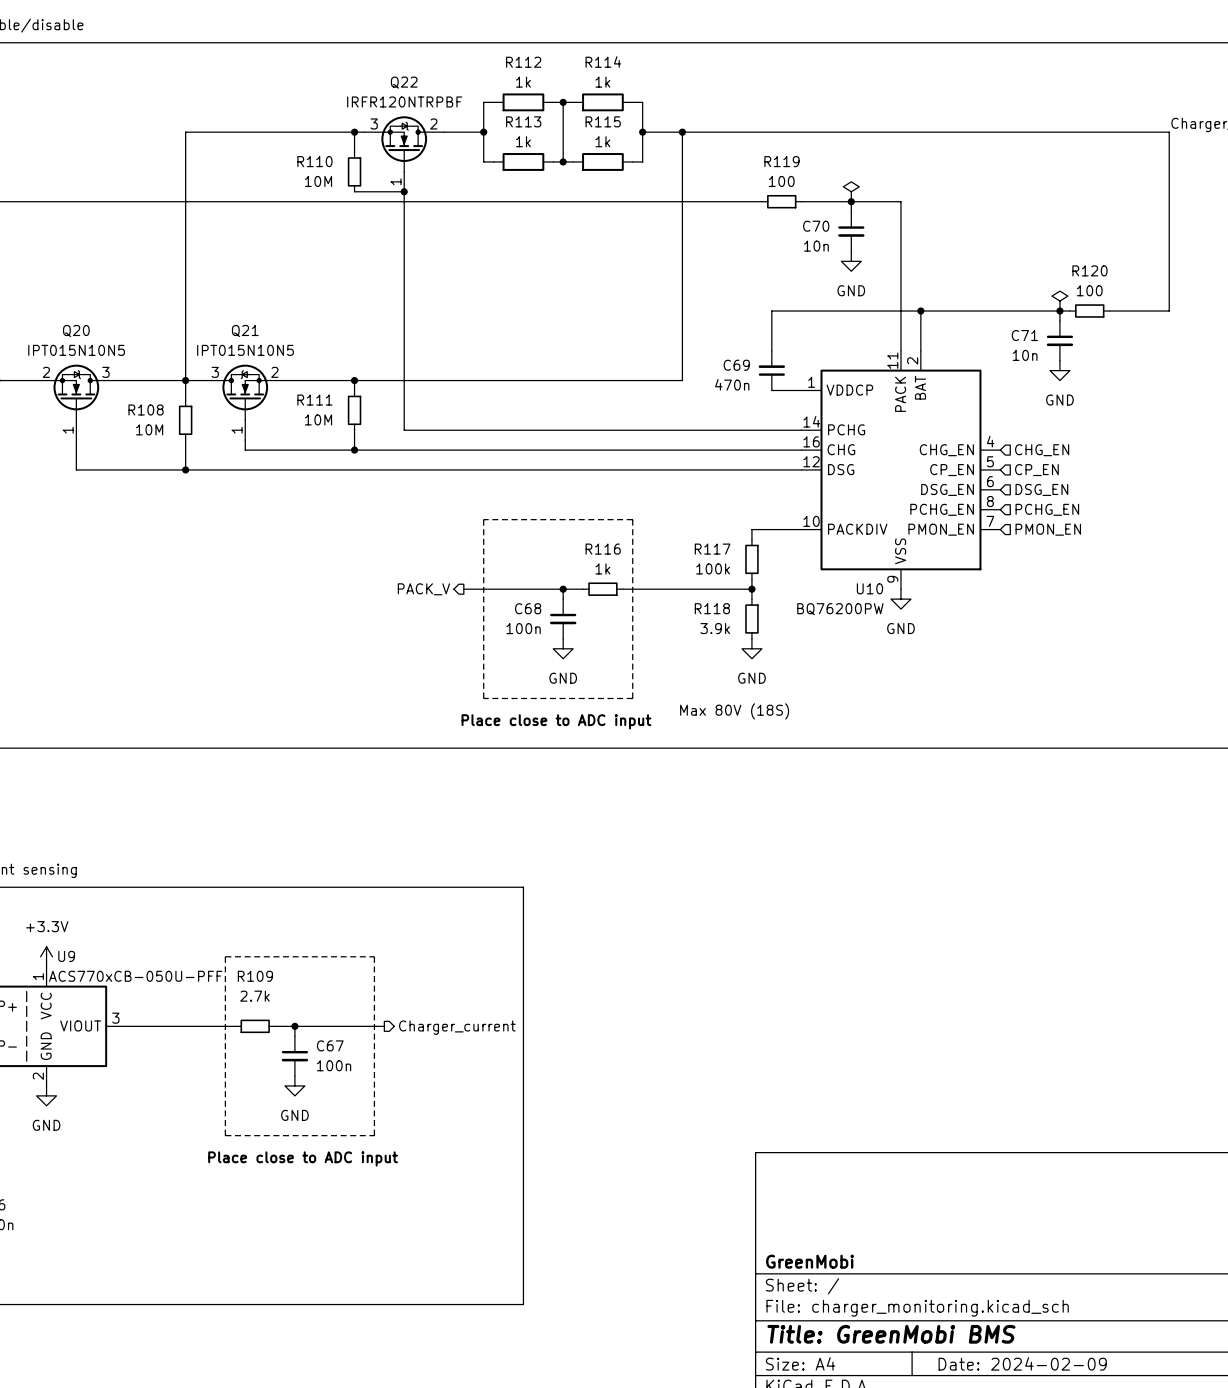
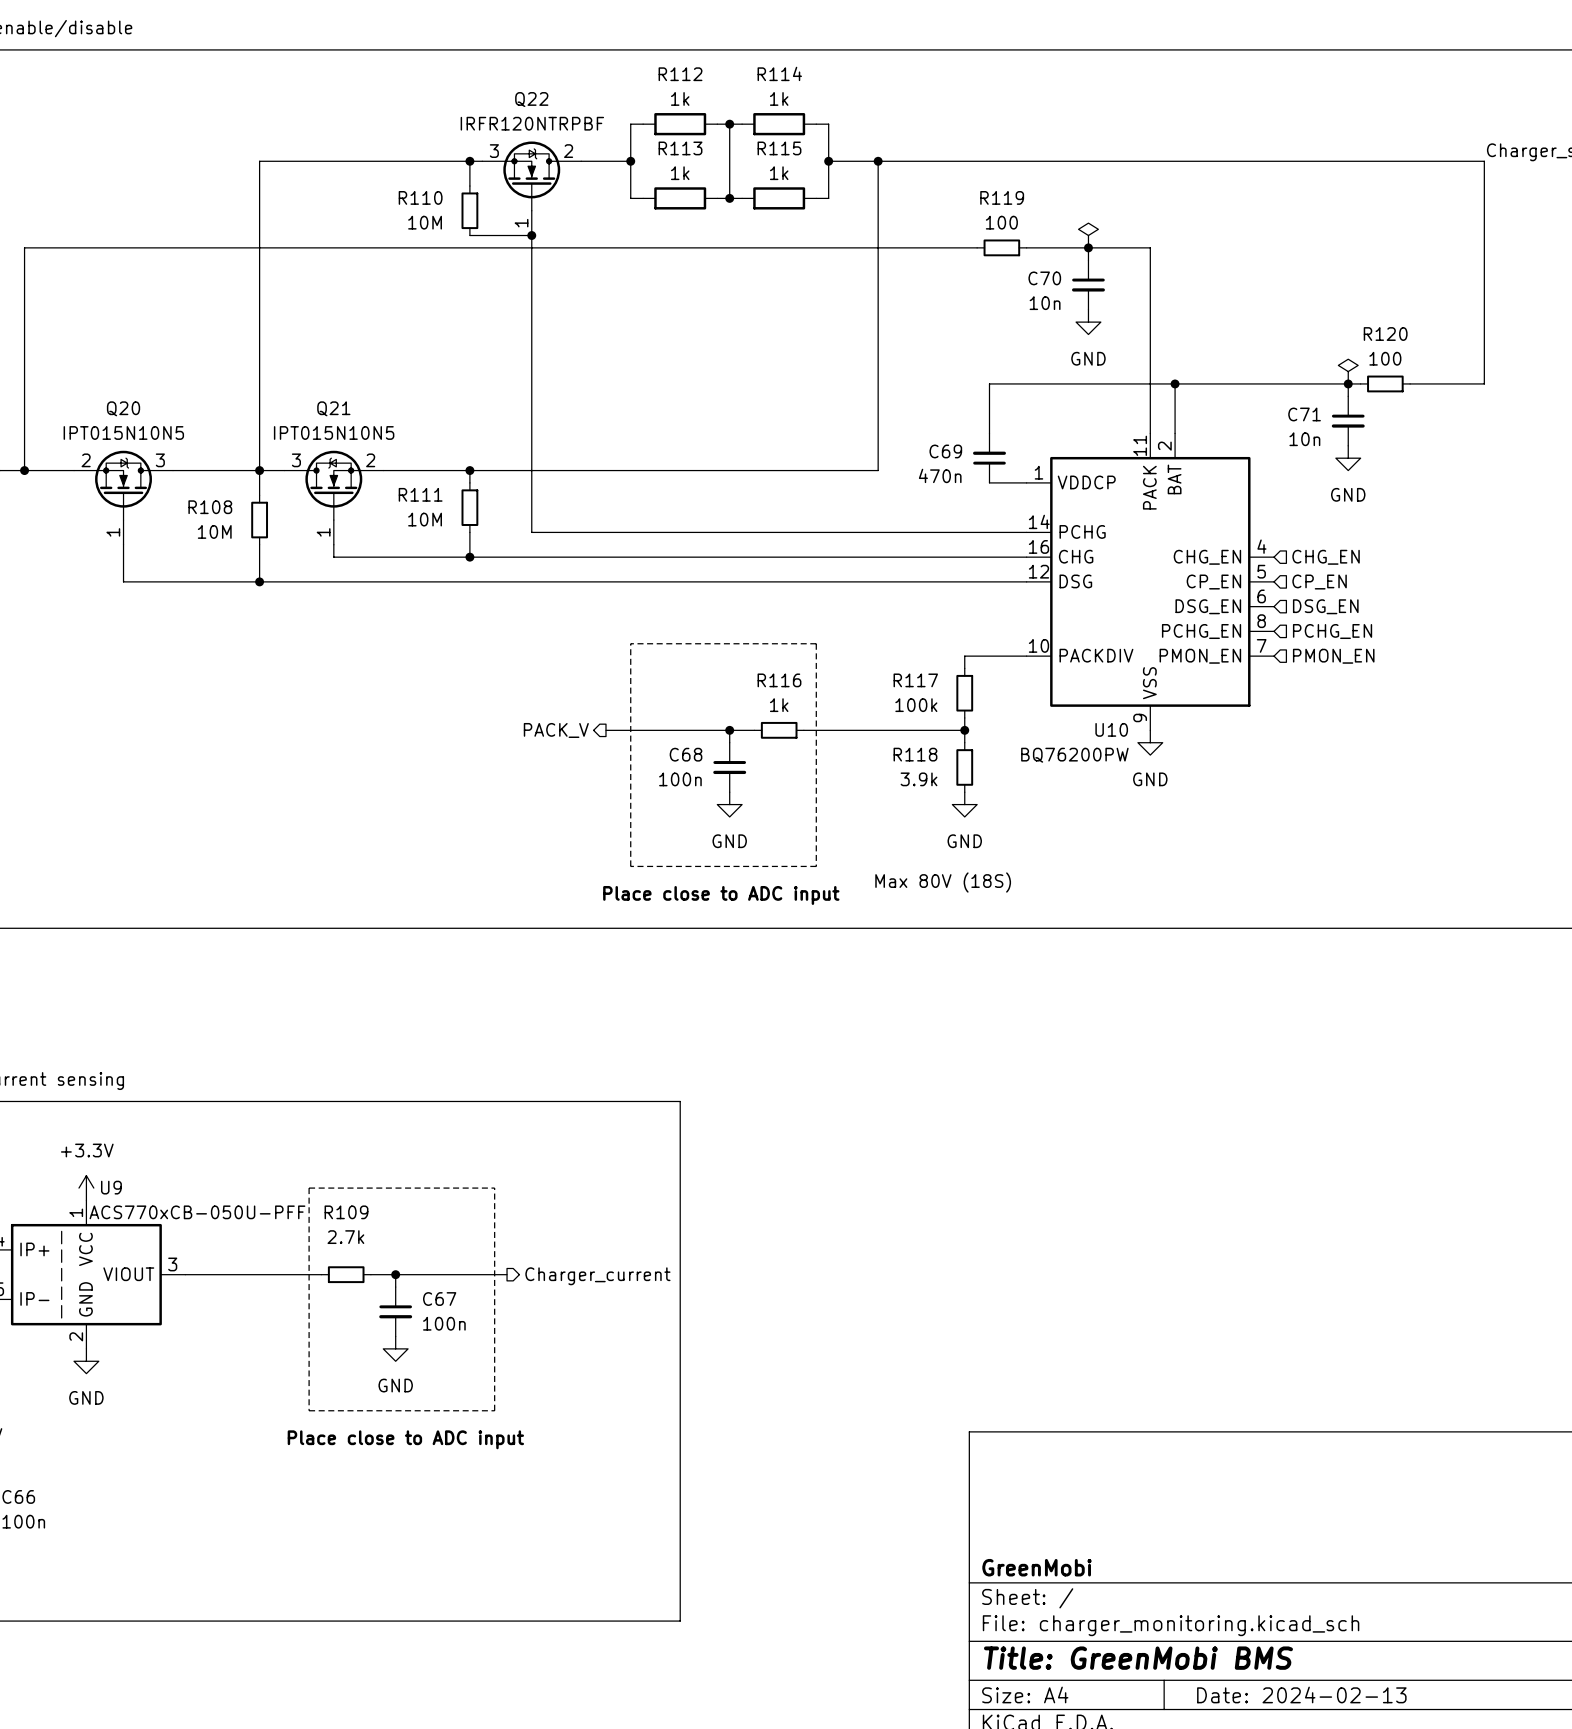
title block: Date: 2024-02-09 (1022, 1363) -> Date: 2024-02-13 (1301, 1694)

